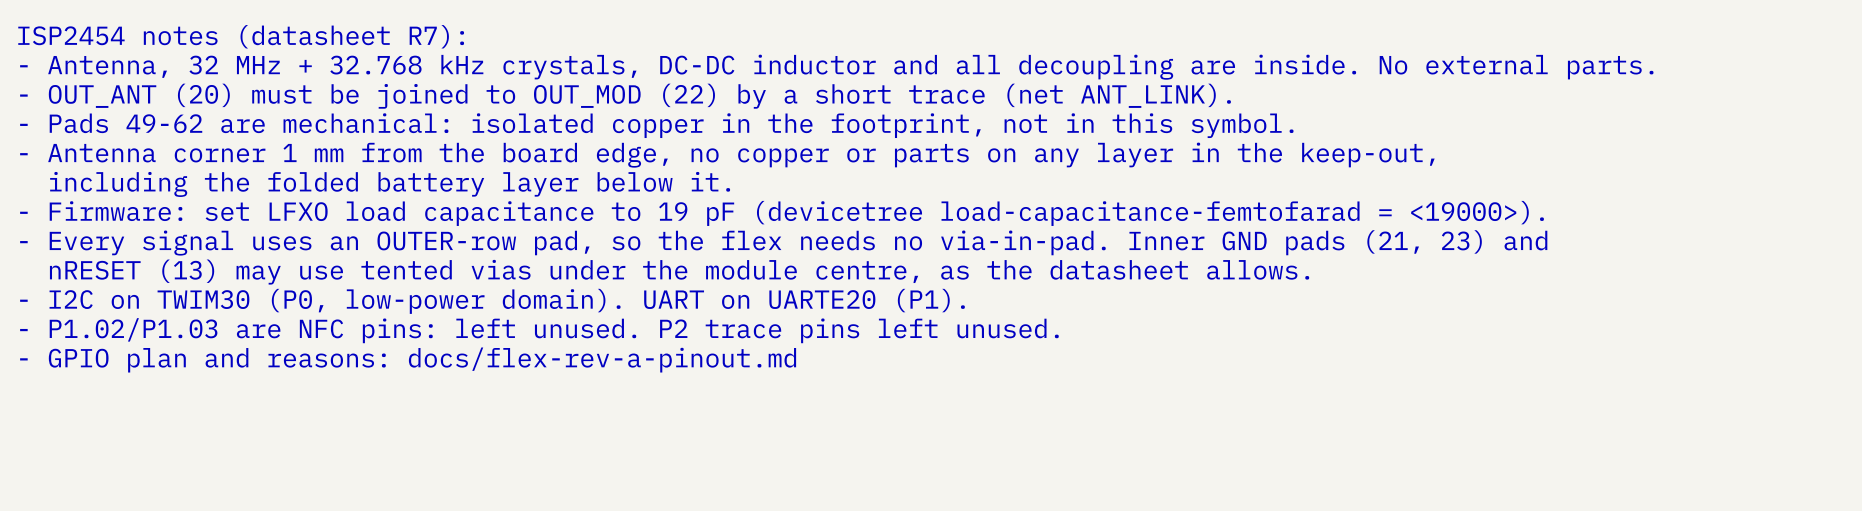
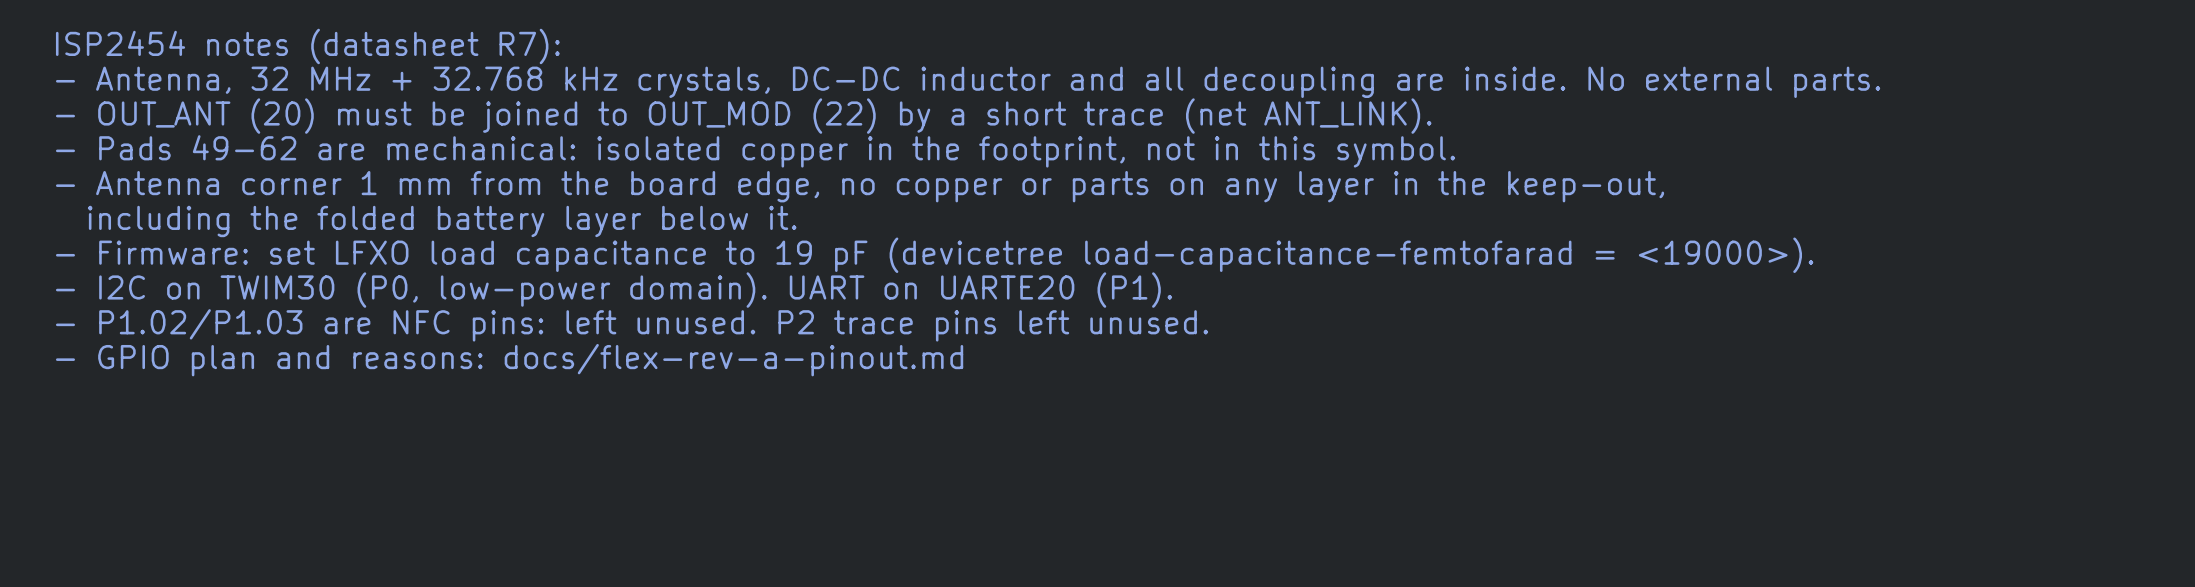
text: - Every signal uses an OUTER-row pad, so the flex needs no via-in-pad. Inner GND pads (21, 23) and (783, 242) -> - I2C on TWIM30 (P0, low-power domain). UART on UARTE20 (P1). (614, 290)
text: nRESET (13) may use tented vias under the module centre, as the datasheet allows. (679, 272) -> - P1.02/P1.03 are NFC pins: left unused. P2 trace pins left unused. (632, 325)
text: - I2C on TWIM30 (P0, low-power domain). UART on UARTE20 (P1). (492, 301) -> - GPIO plan and reasons: docs/flex-rev-a-pinout.md (509, 360)
text: - P1.02/P1.03 are NFC pins: left unused. P2 trace pins left unused. (539, 330) -> none
text: - GPIO plan and reasons: docs/flex-rev-a-pinout.md (408, 359) -> none

